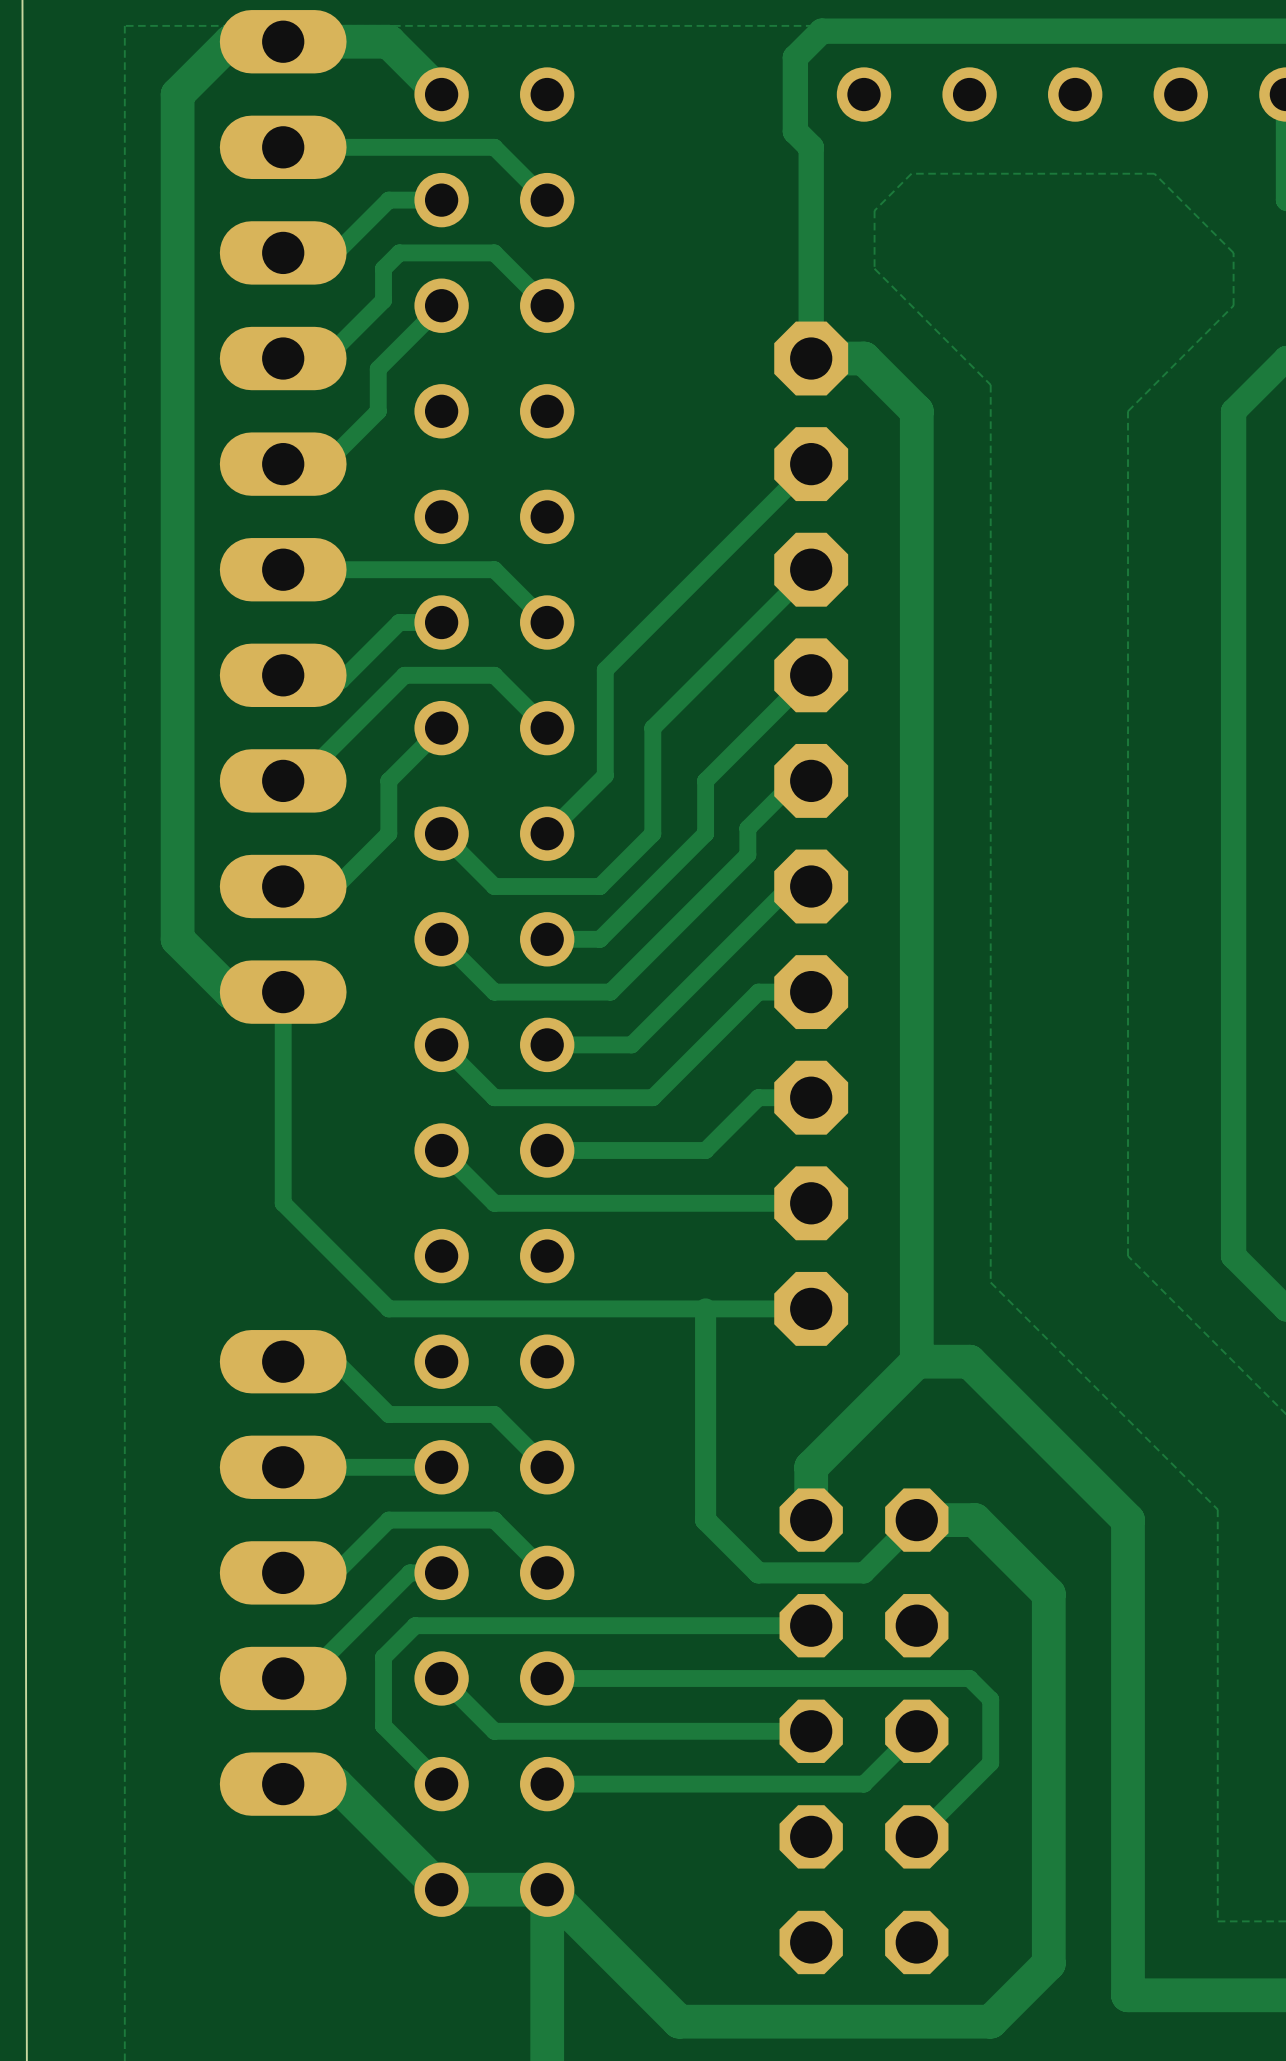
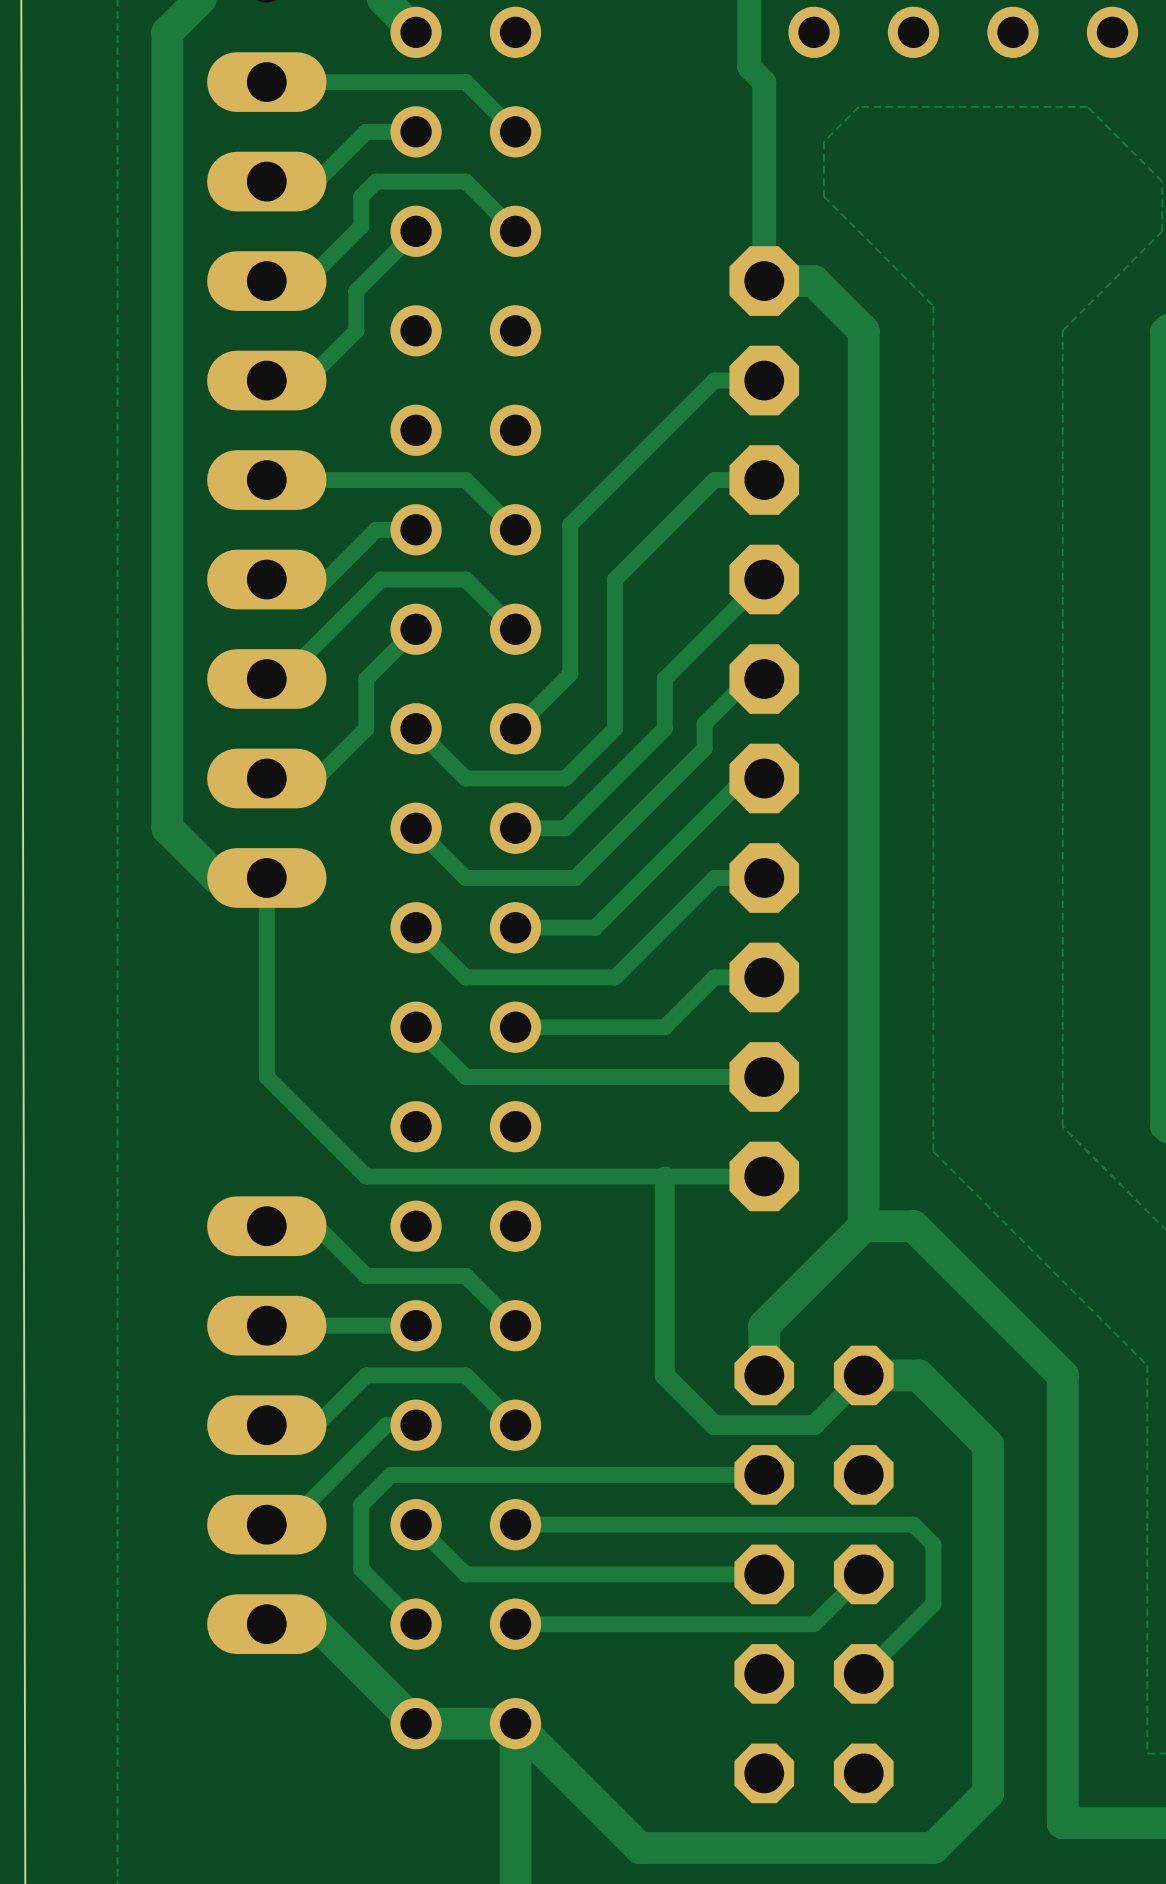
track: (811, 464) (605, 670) -> (764, 380) (714, 380) (570, 524) (570, 574)
track: (811, 569) (652, 728) -> (764, 480) (714, 480) (615, 579) (615, 629)

